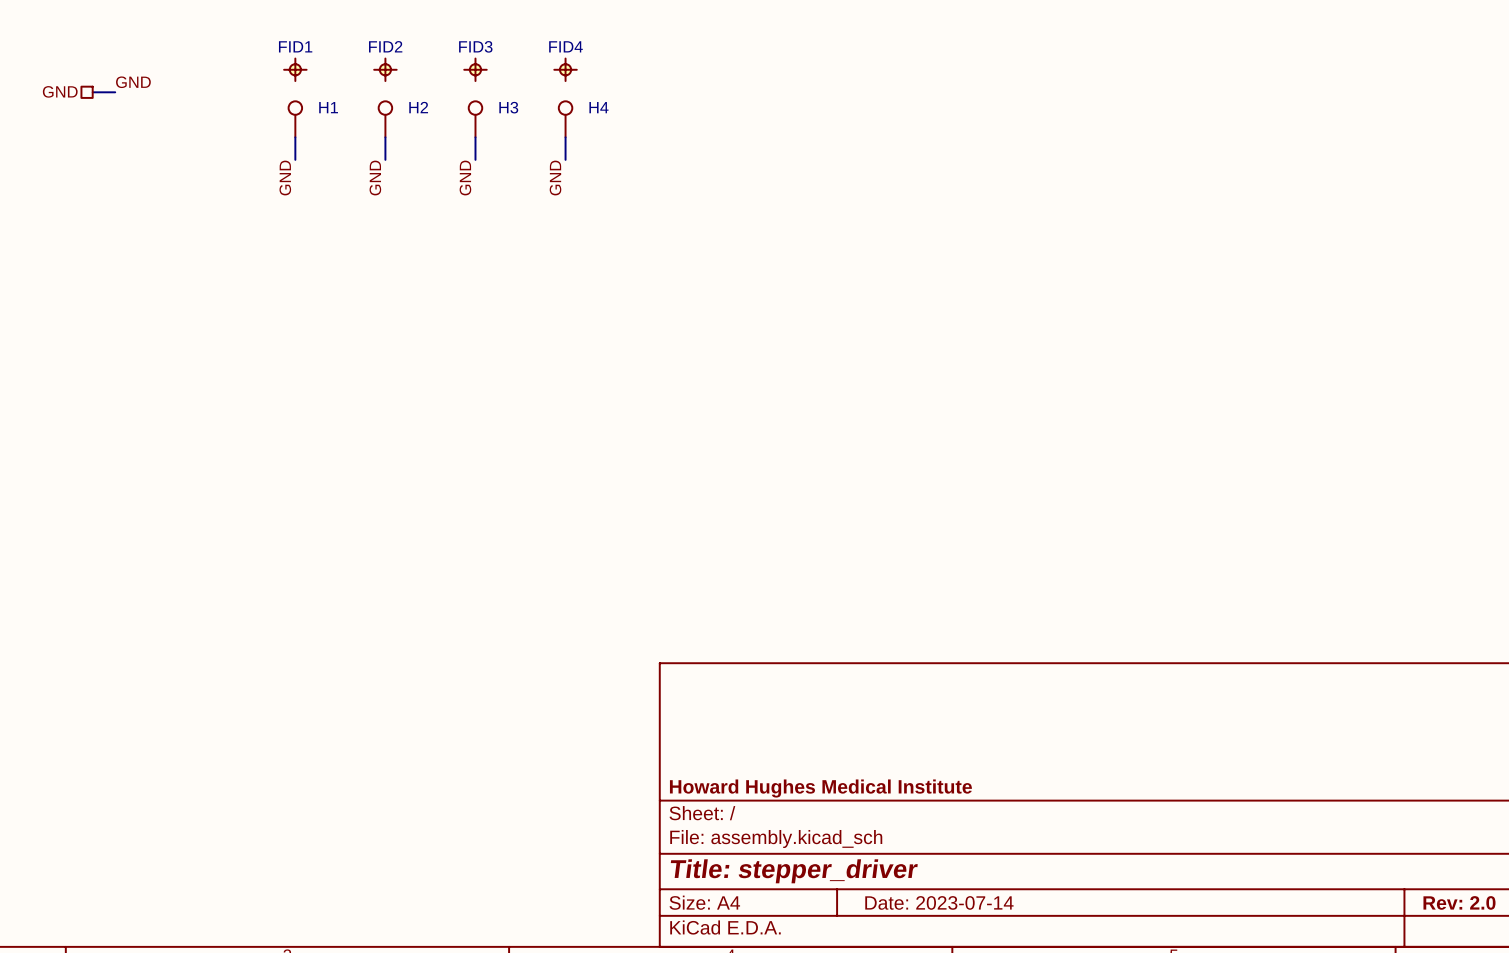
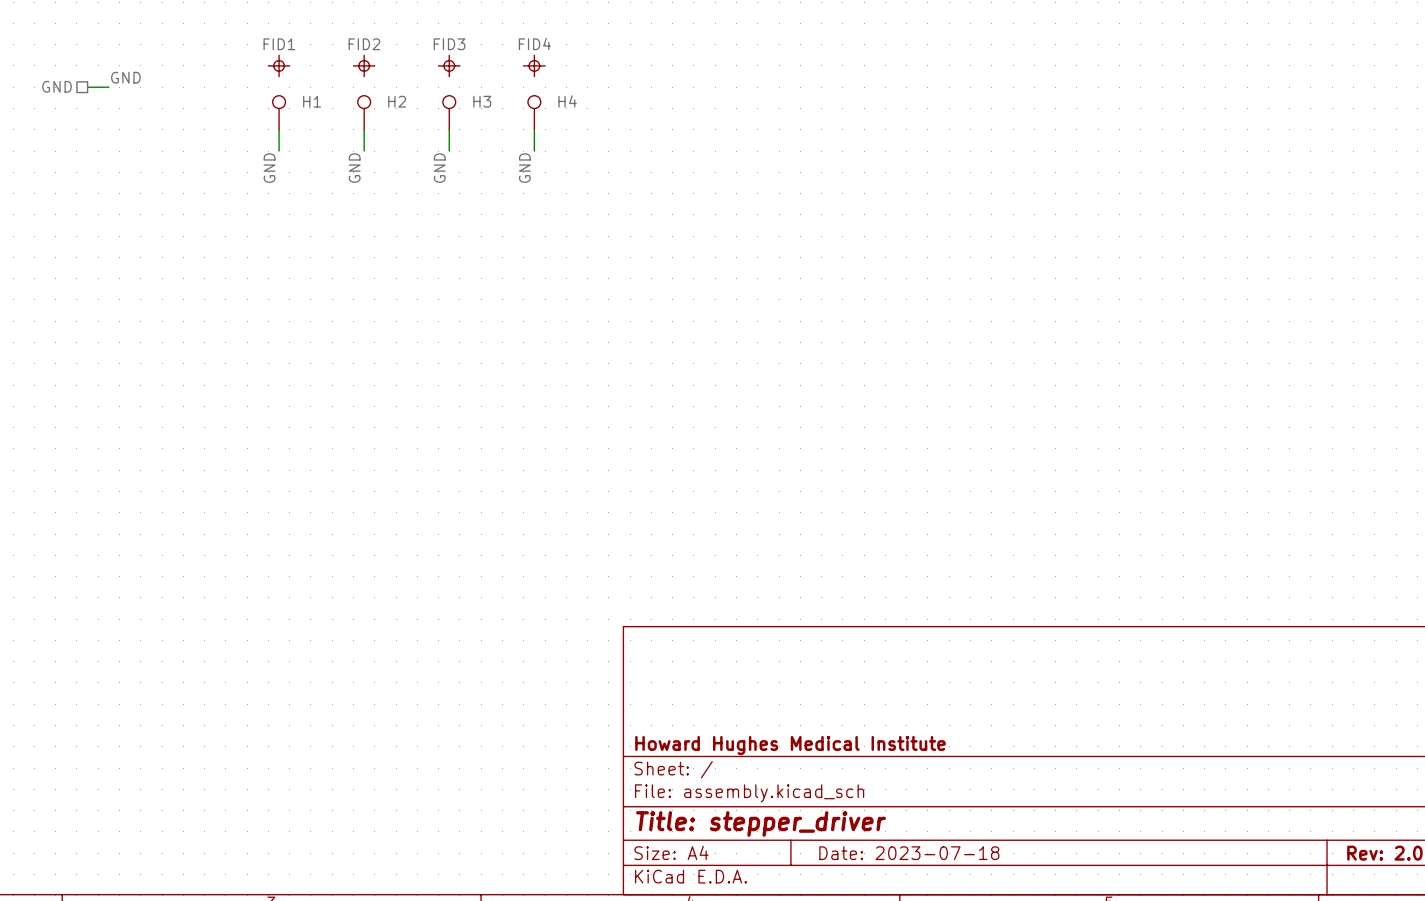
title block: Date: 2023-07-14 (939, 902) -> Date: 2023-07-18 (909, 853)

